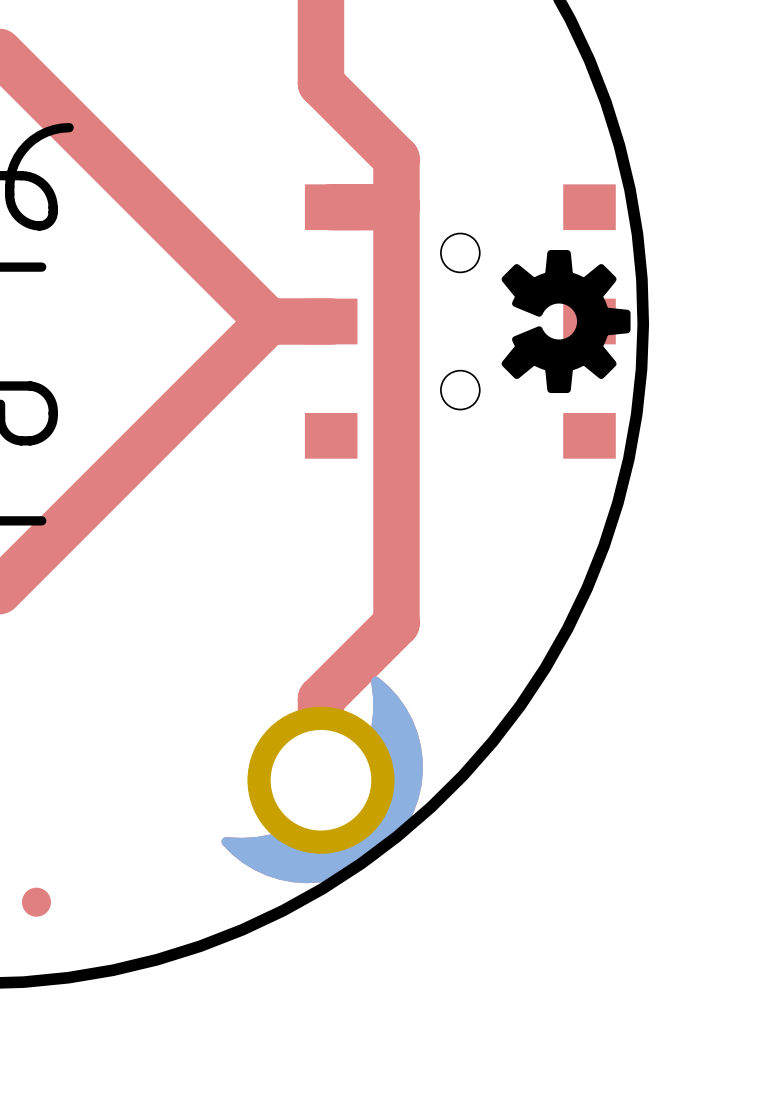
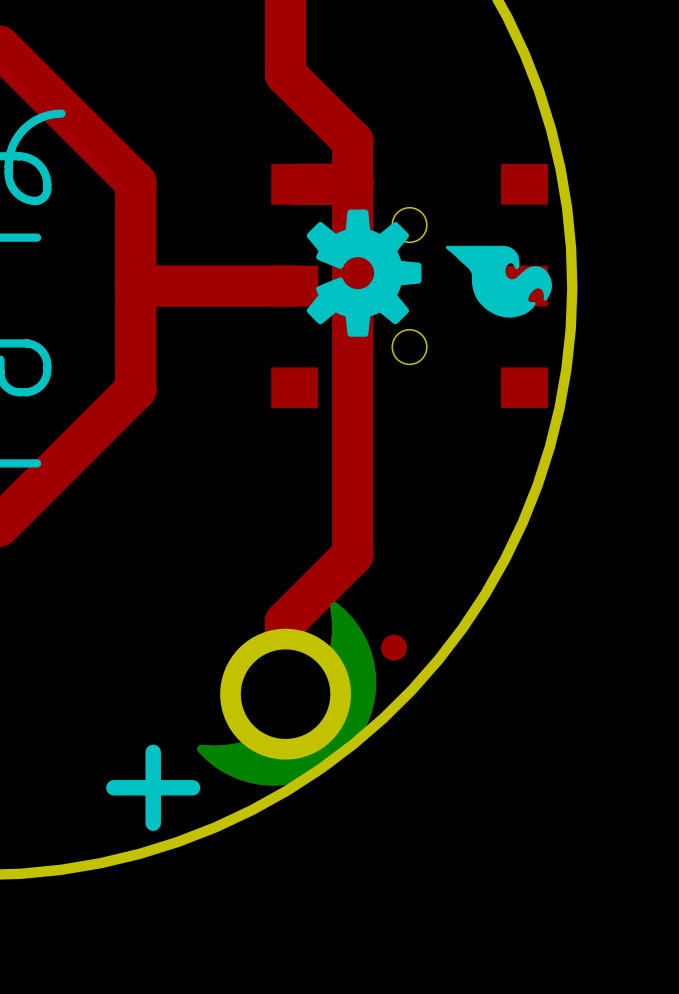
top track: (152, 205) (268, 321) (152, 437) -> (135, 182) (135, 389)
drawing: none -> [445, 245, 552, 318]
top track: none -> (239, 286) (135, 286)
drawing position: (566, 321) -> (364, 273)
text: none -> + (153, 787)
part position: (36, 902) -> (394, 647)

